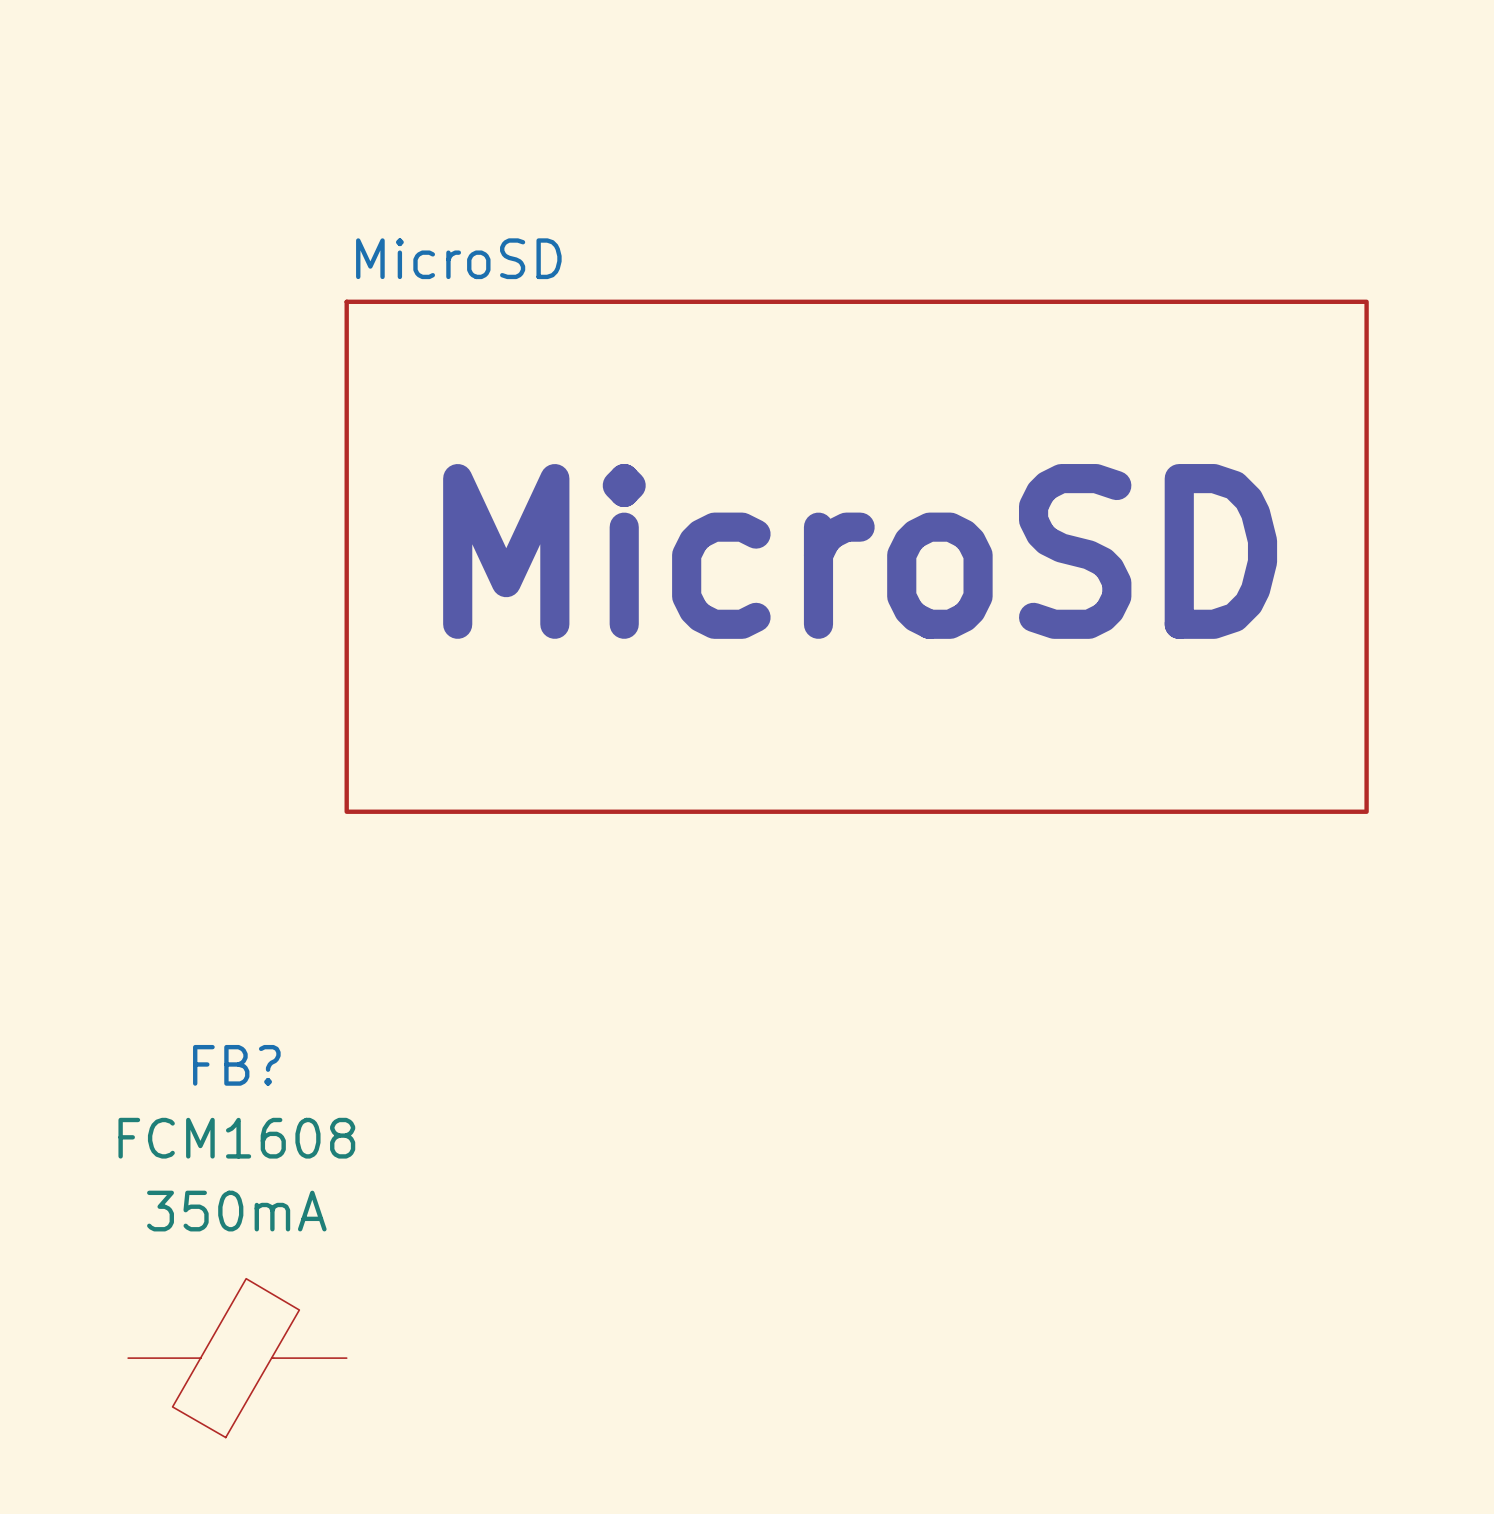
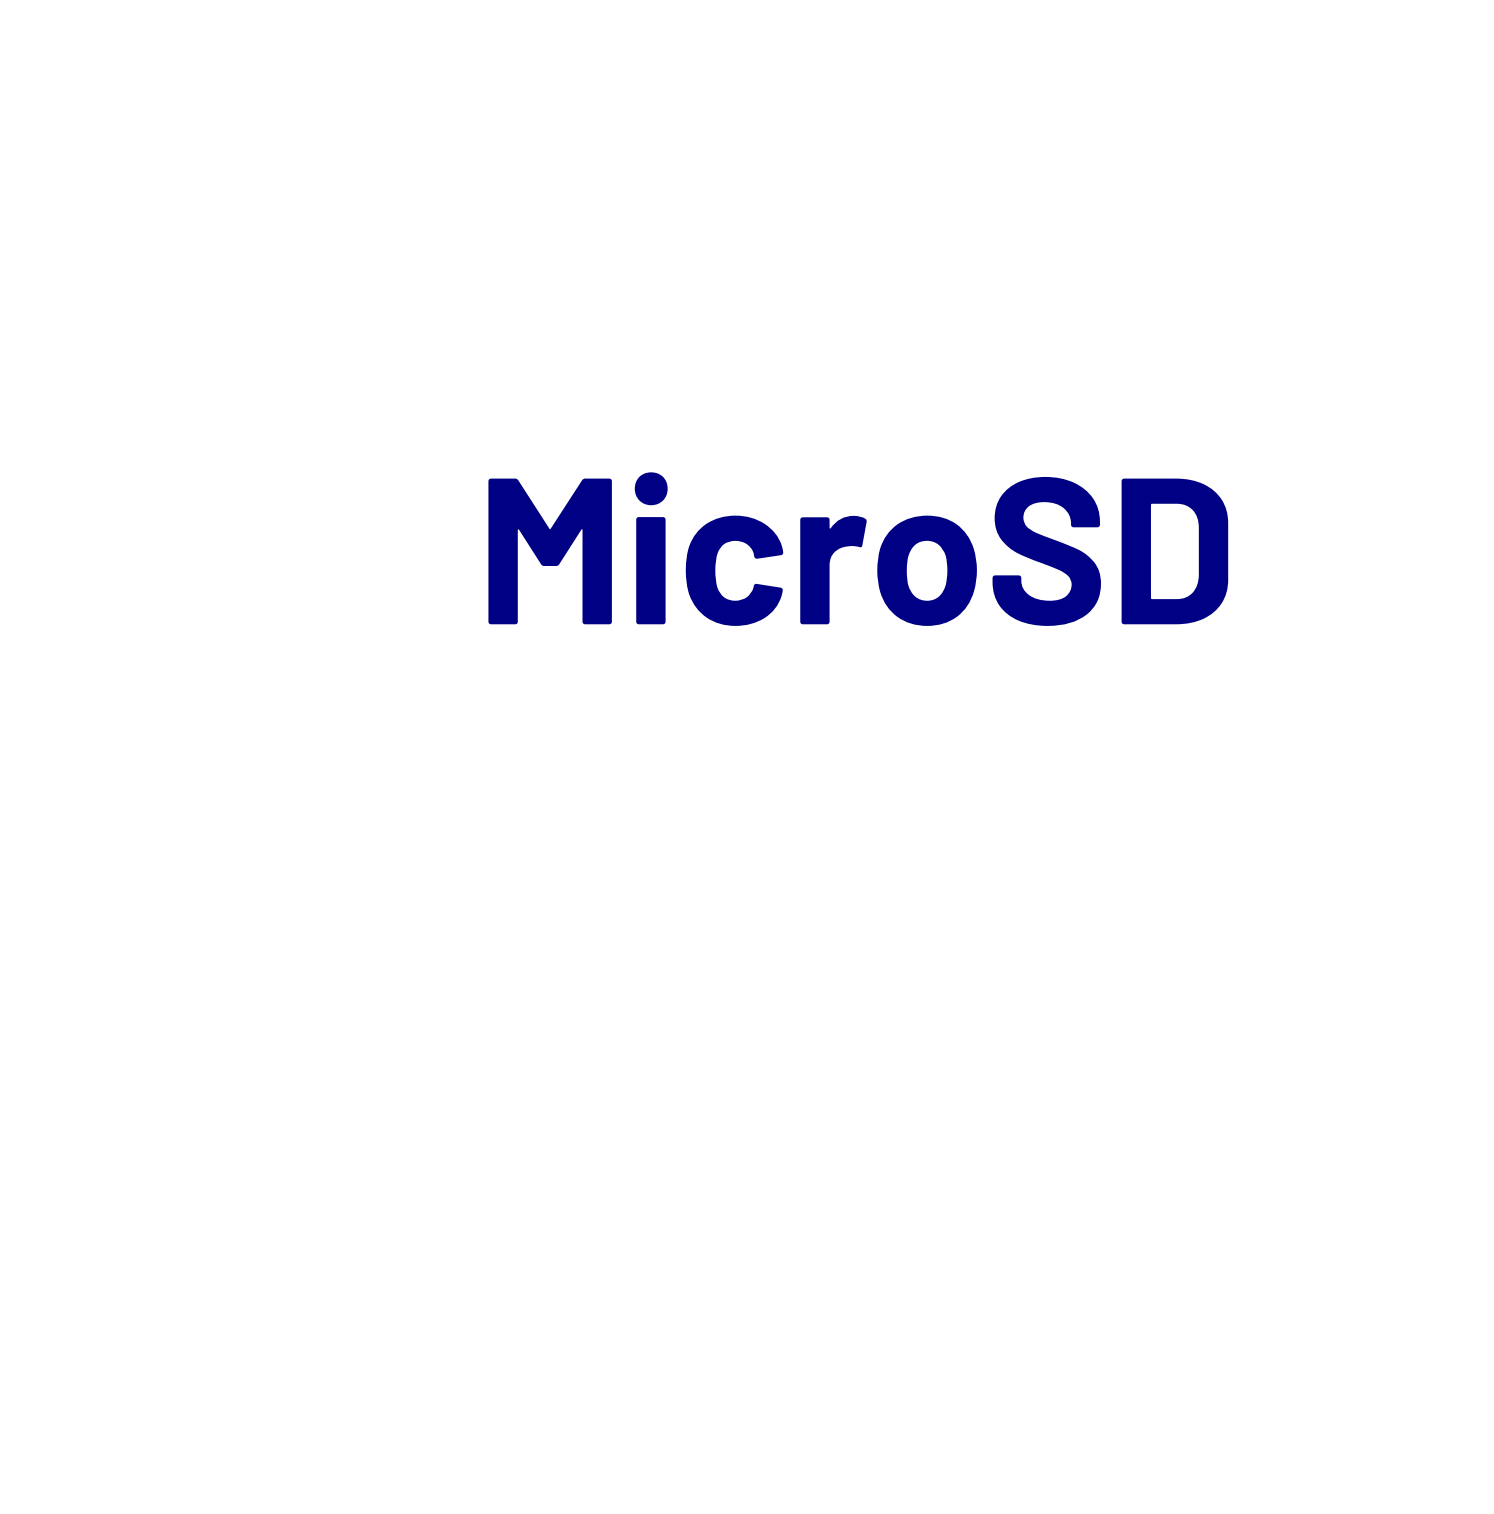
sheet MicroSD: (856, 556) -> none
FB?: FCM1608 (237, 1358) -> none

